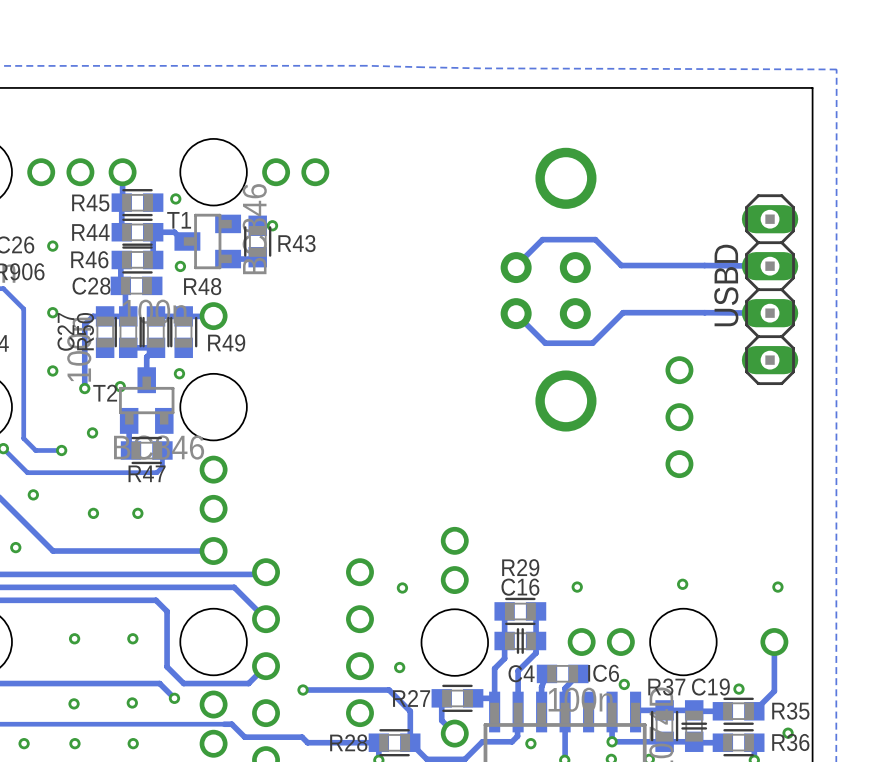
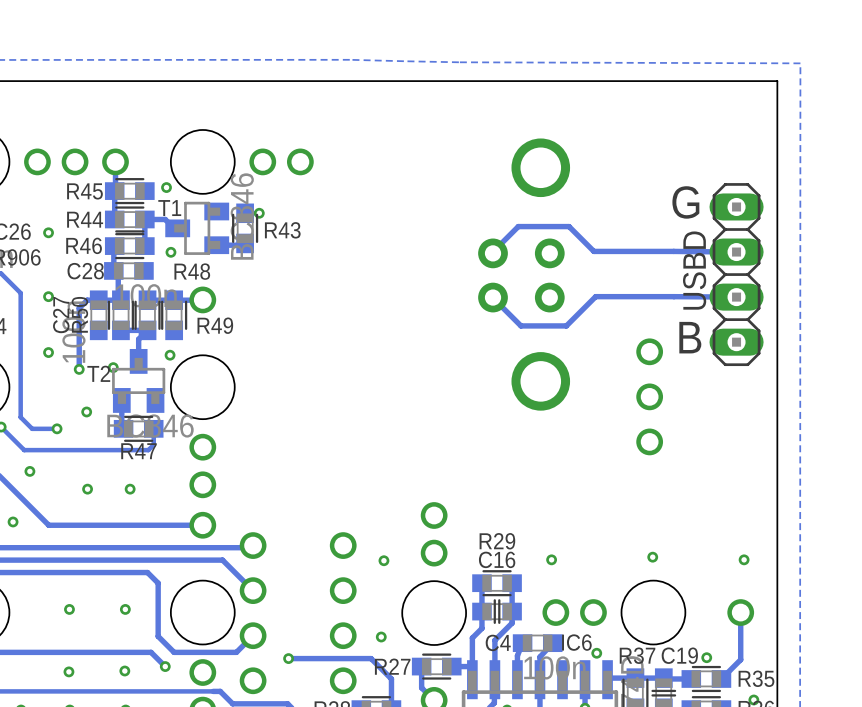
text: none -> G (685, 202)
text: none -> B (690, 337)

